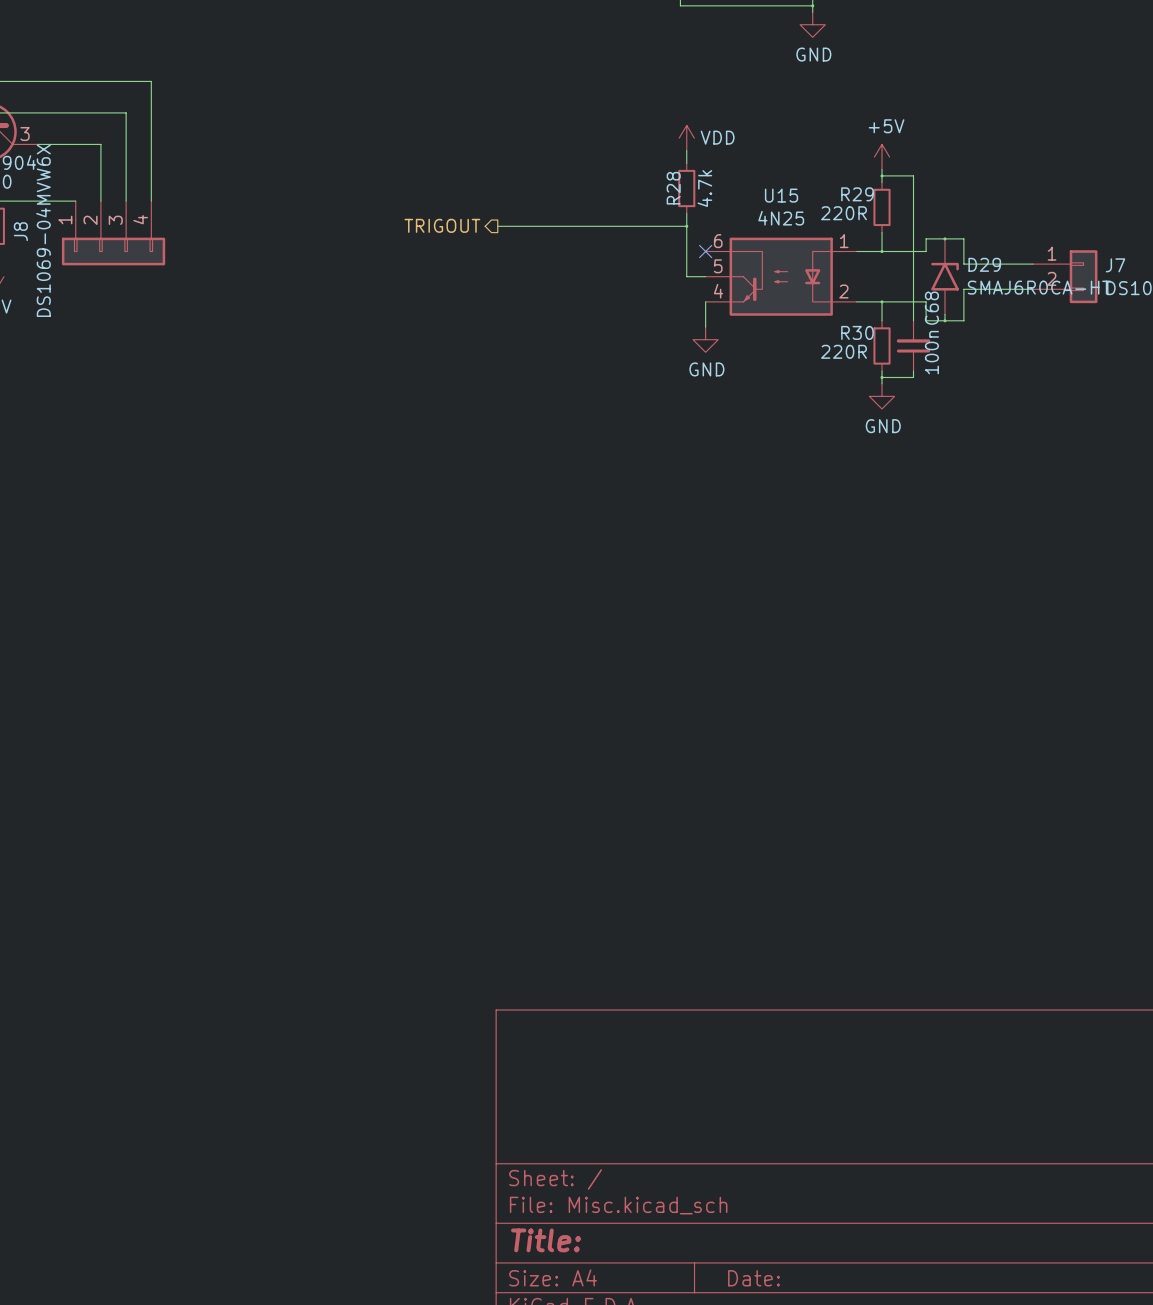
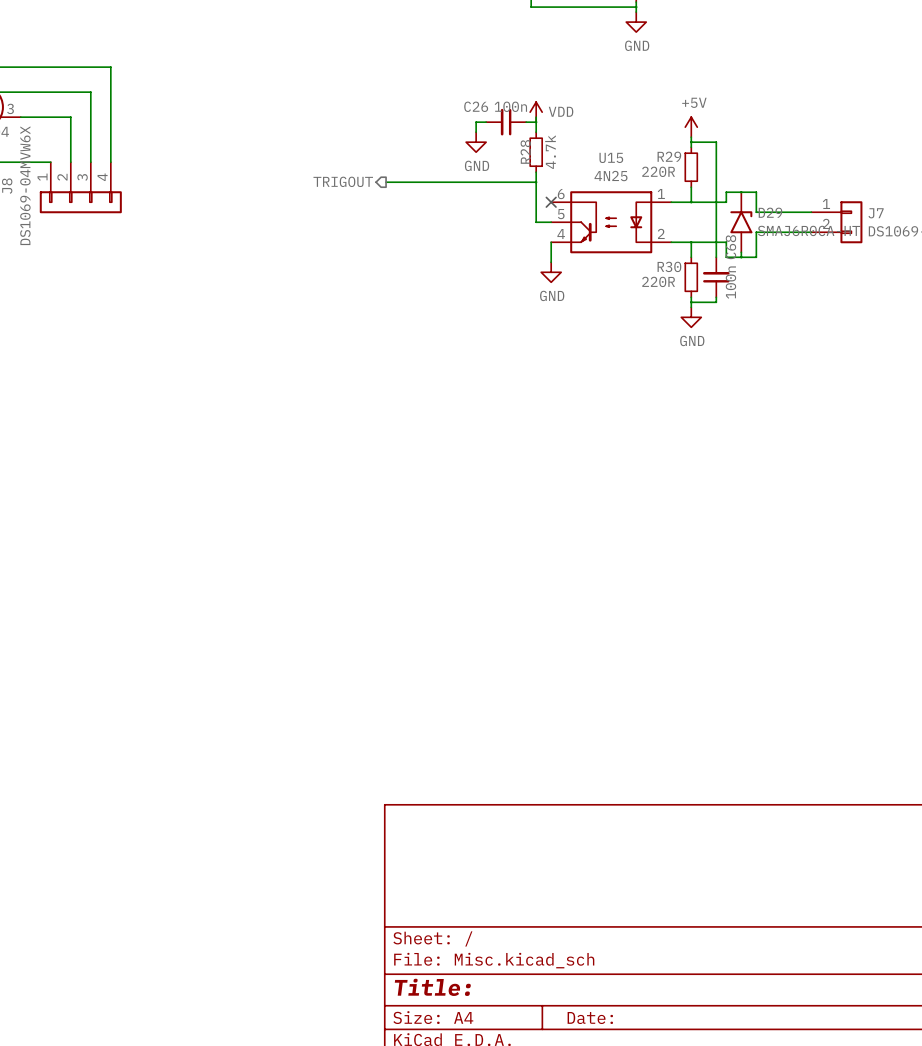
wire: none -> (536, 117) (536, 122) (526, 122)
wire: none -> (486, 122) (476, 122) (476, 132)
C26: none -> 100n (506, 122)
power symbol: none -> GND (476, 142)

